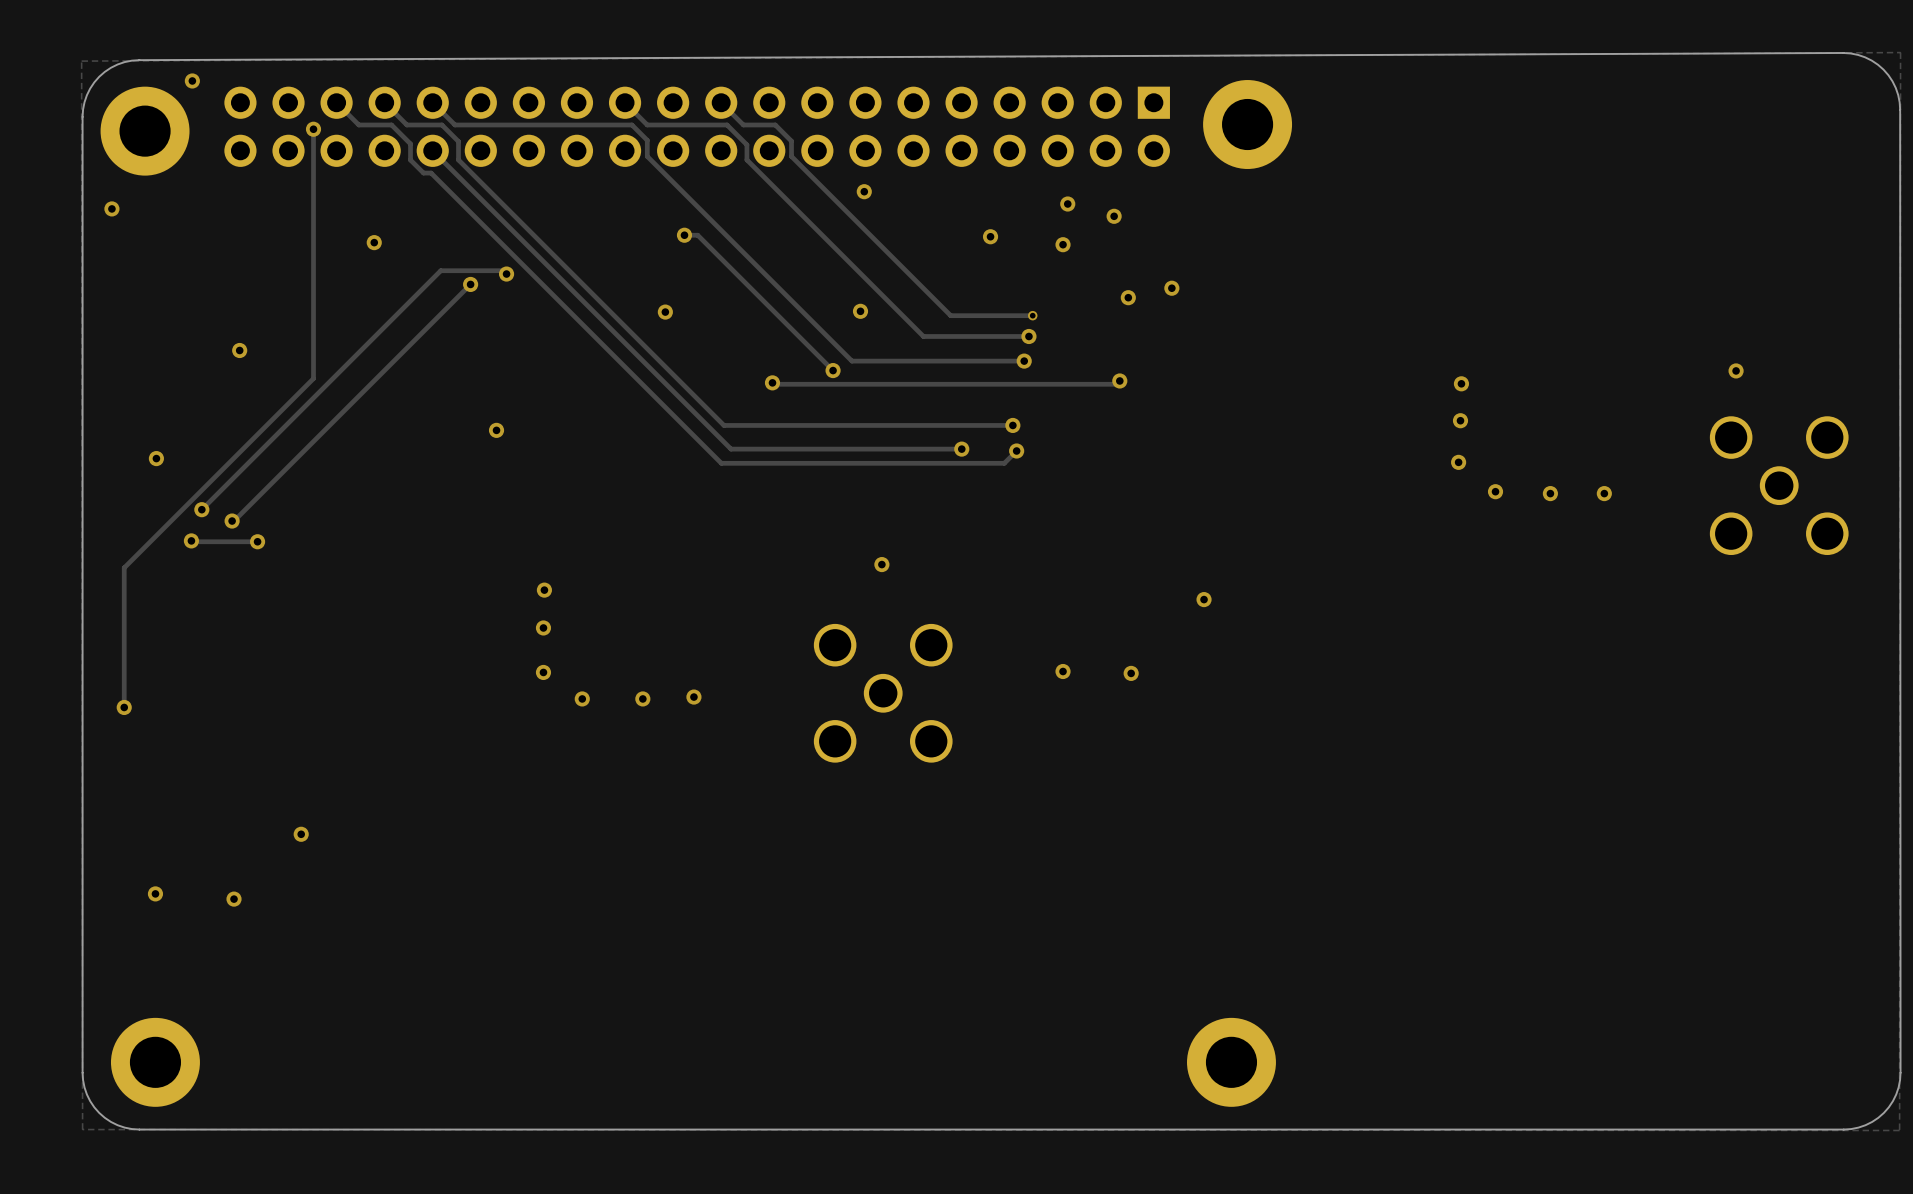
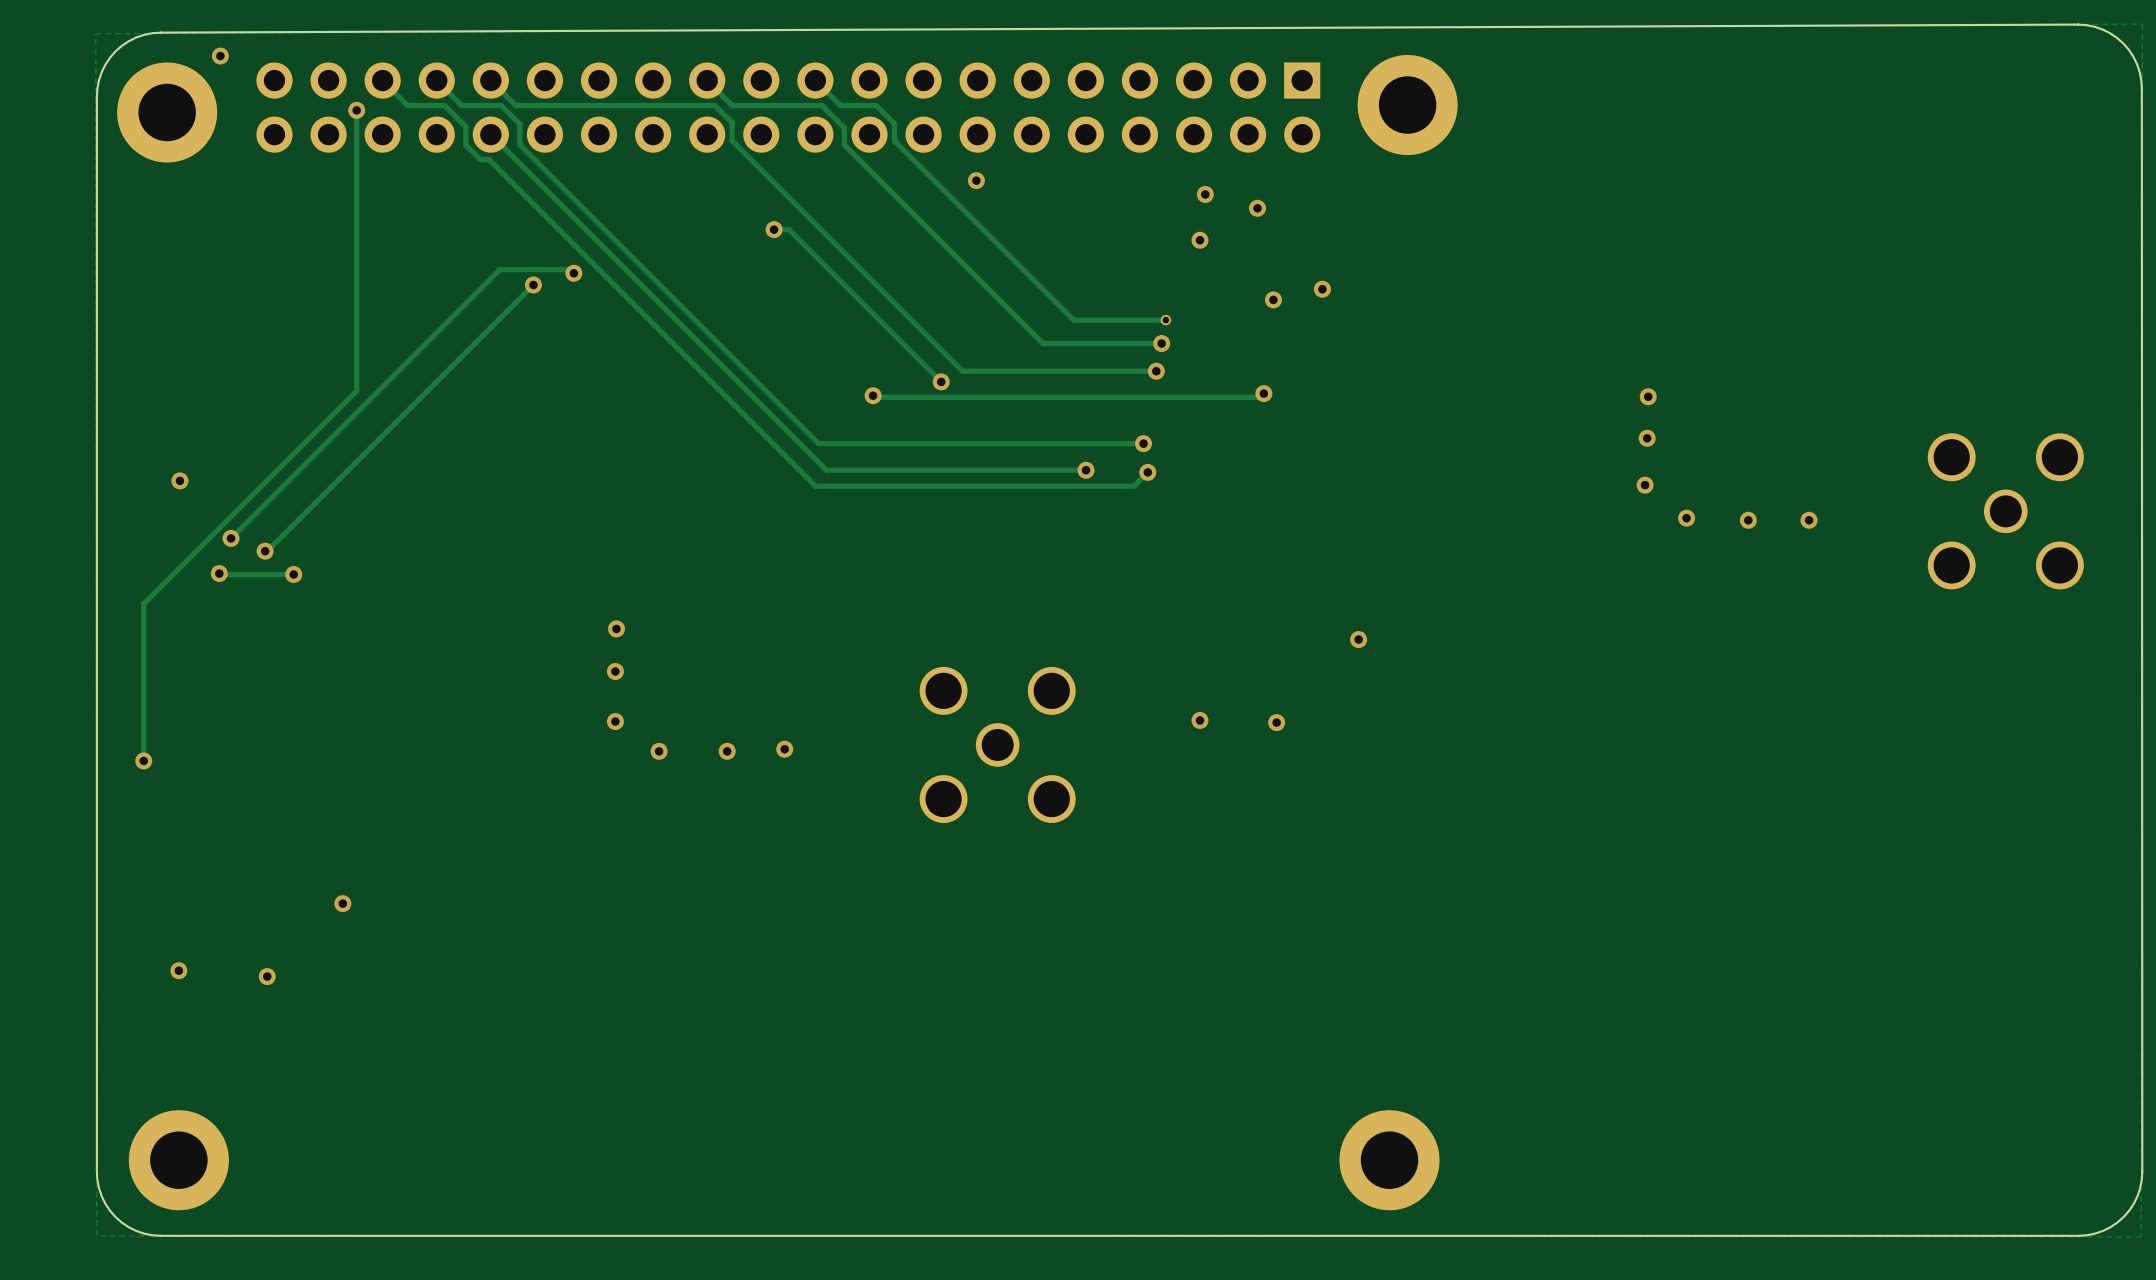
via: (111, 208) -> none
via: (990, 236) -> none
via: (374, 242) -> none
via: (860, 311) -> none
via: (665, 312) -> none
via: (239, 350) -> none
via: (1736, 370) -> none
via: (496, 430) -> none
via: (881, 564) -> none

